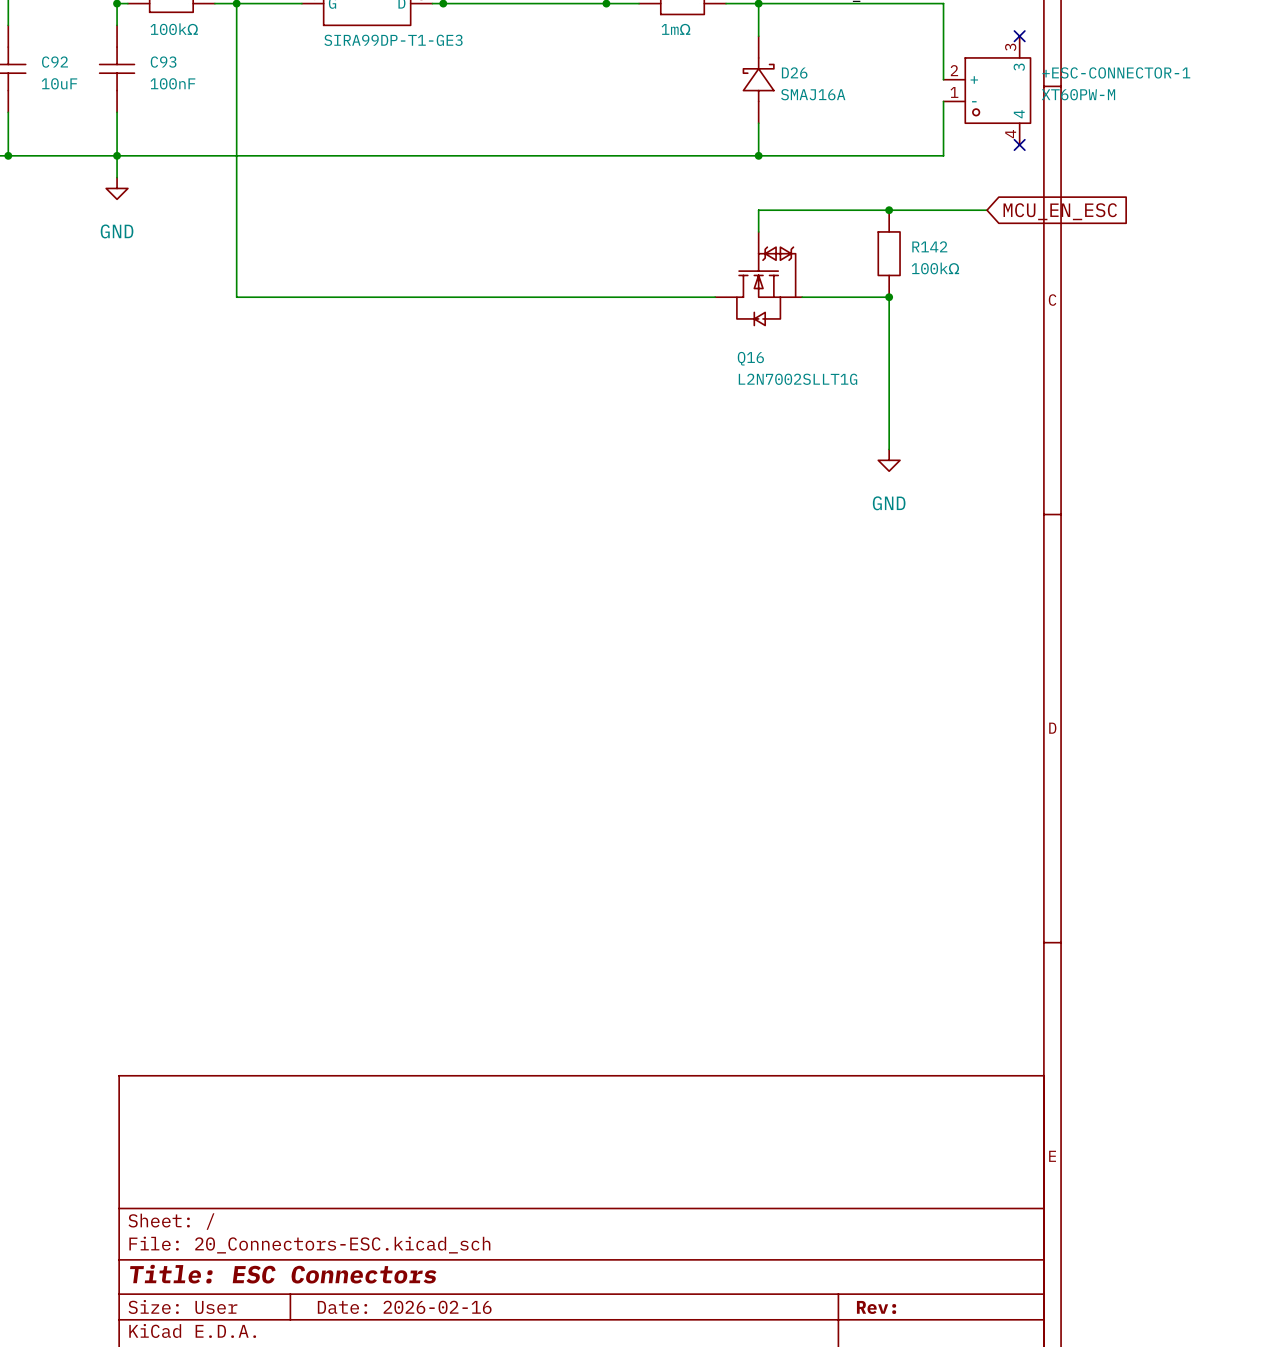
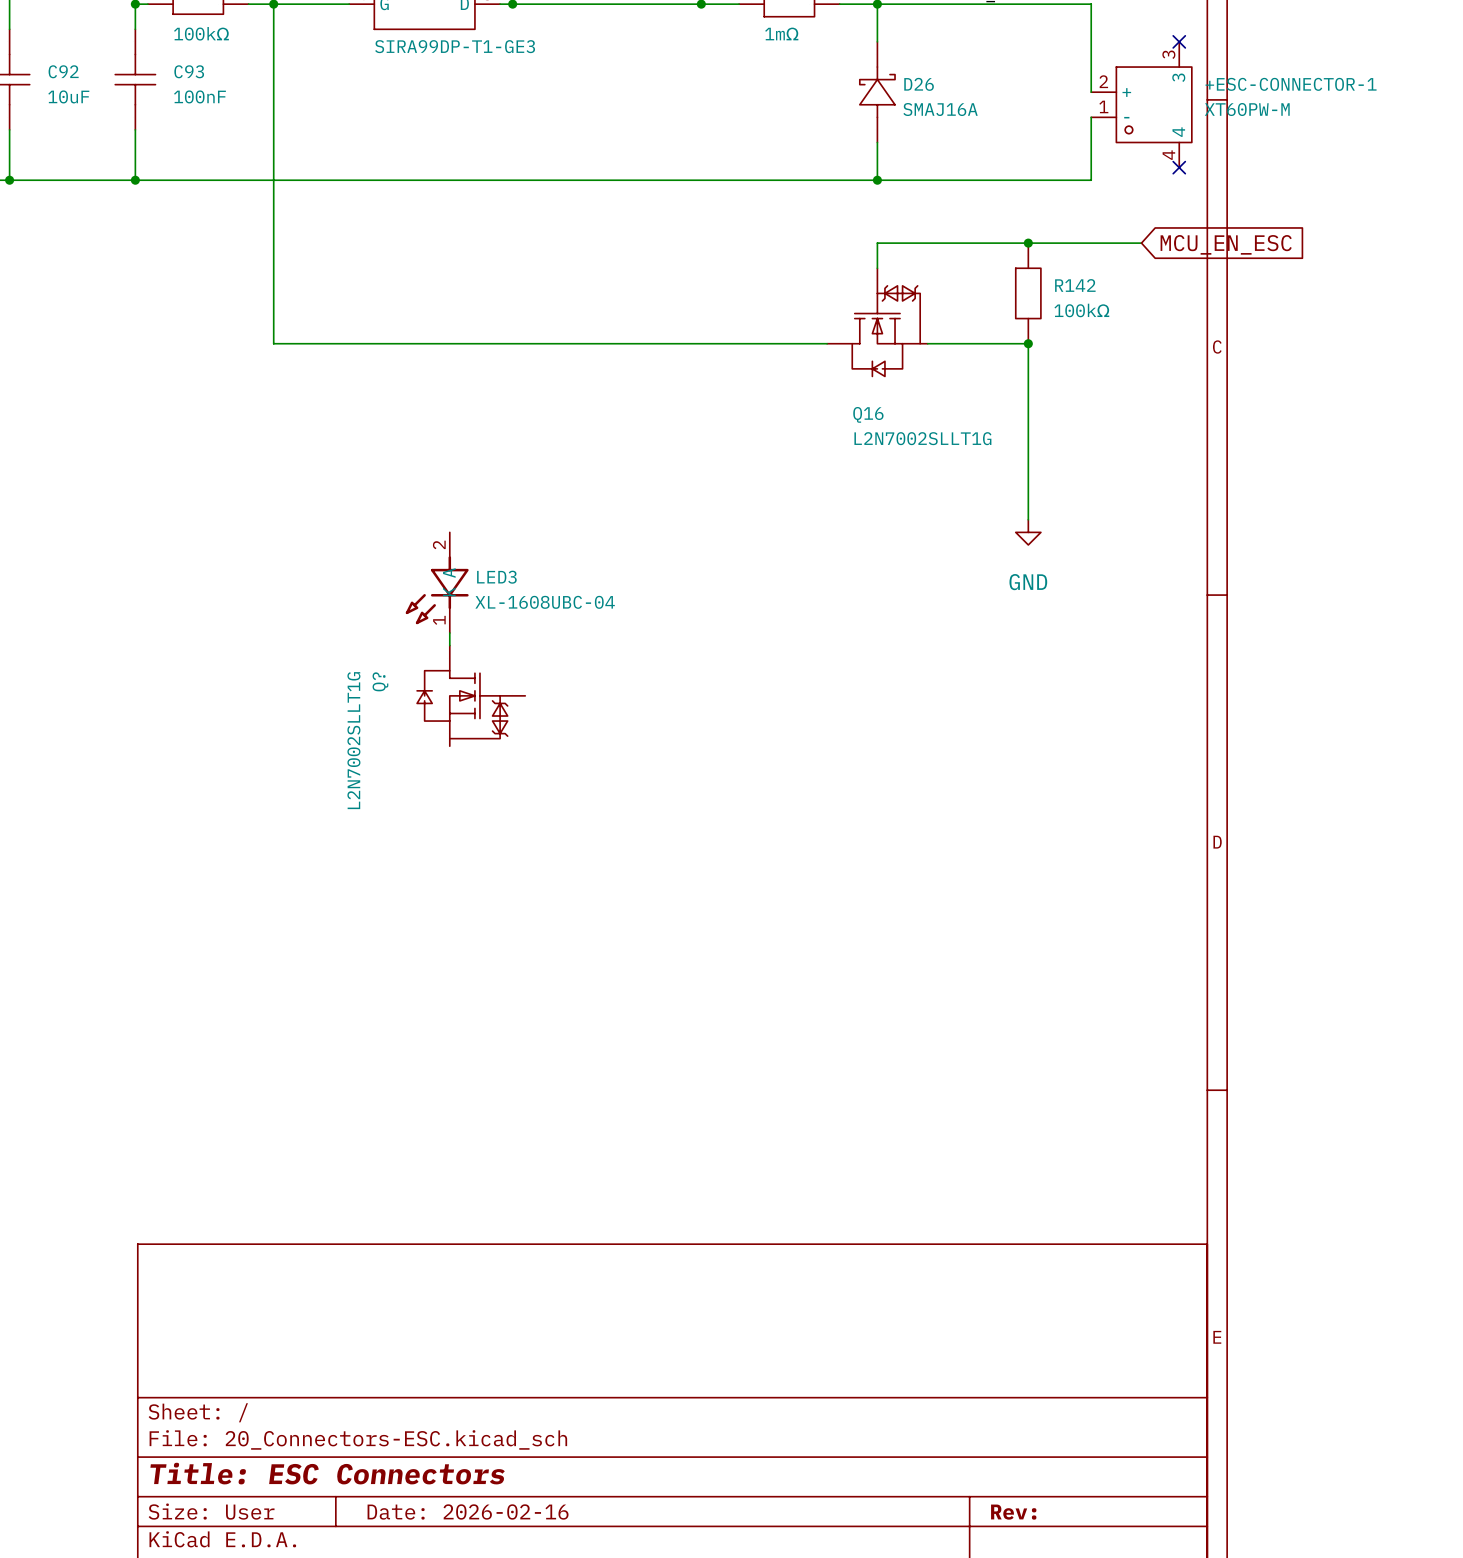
wire: (117, 155) (117, 177) -> none
power symbol: GND (117, 188) -> none
LED3: none -> XL-1608UBC-04 (437, 582)
wire: none -> (449, 632) (449, 645)
Q?: none -> L2N7002SLLT1G (471, 695)

